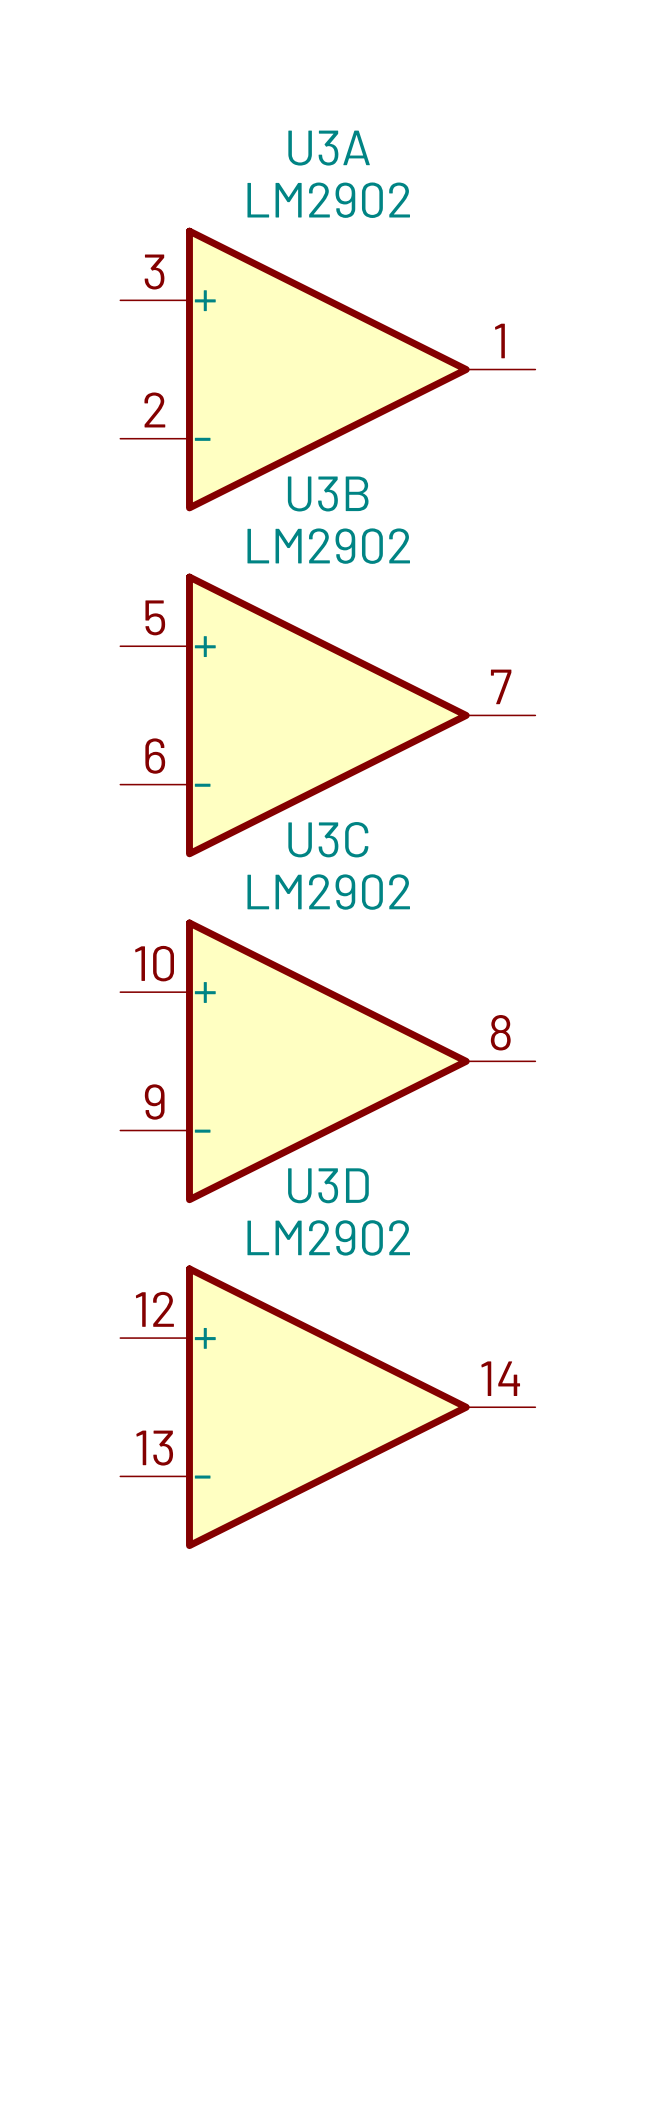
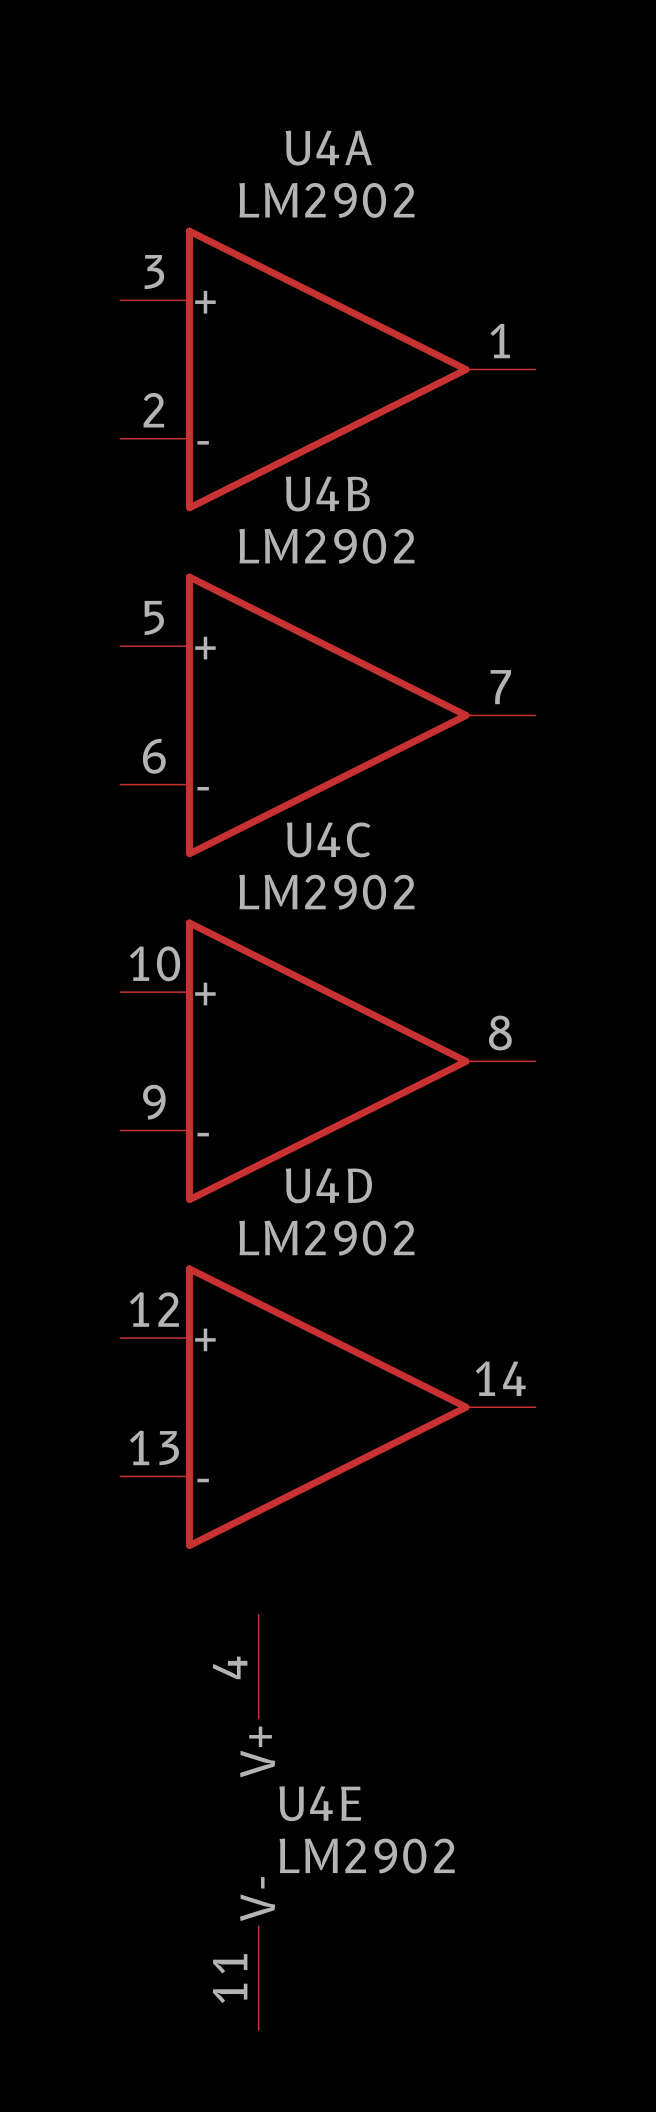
U3A name: U3A (329, 148) -> U4A (328, 148)
U3B name: U3B (328, 493) -> U4B (327, 493)
U3C name: U3C (328, 839) -> U4C (328, 839)
U3D name: U3D (328, 1185) -> U4D (328, 1185)
U4E: none -> LM2902 (258, 1822)

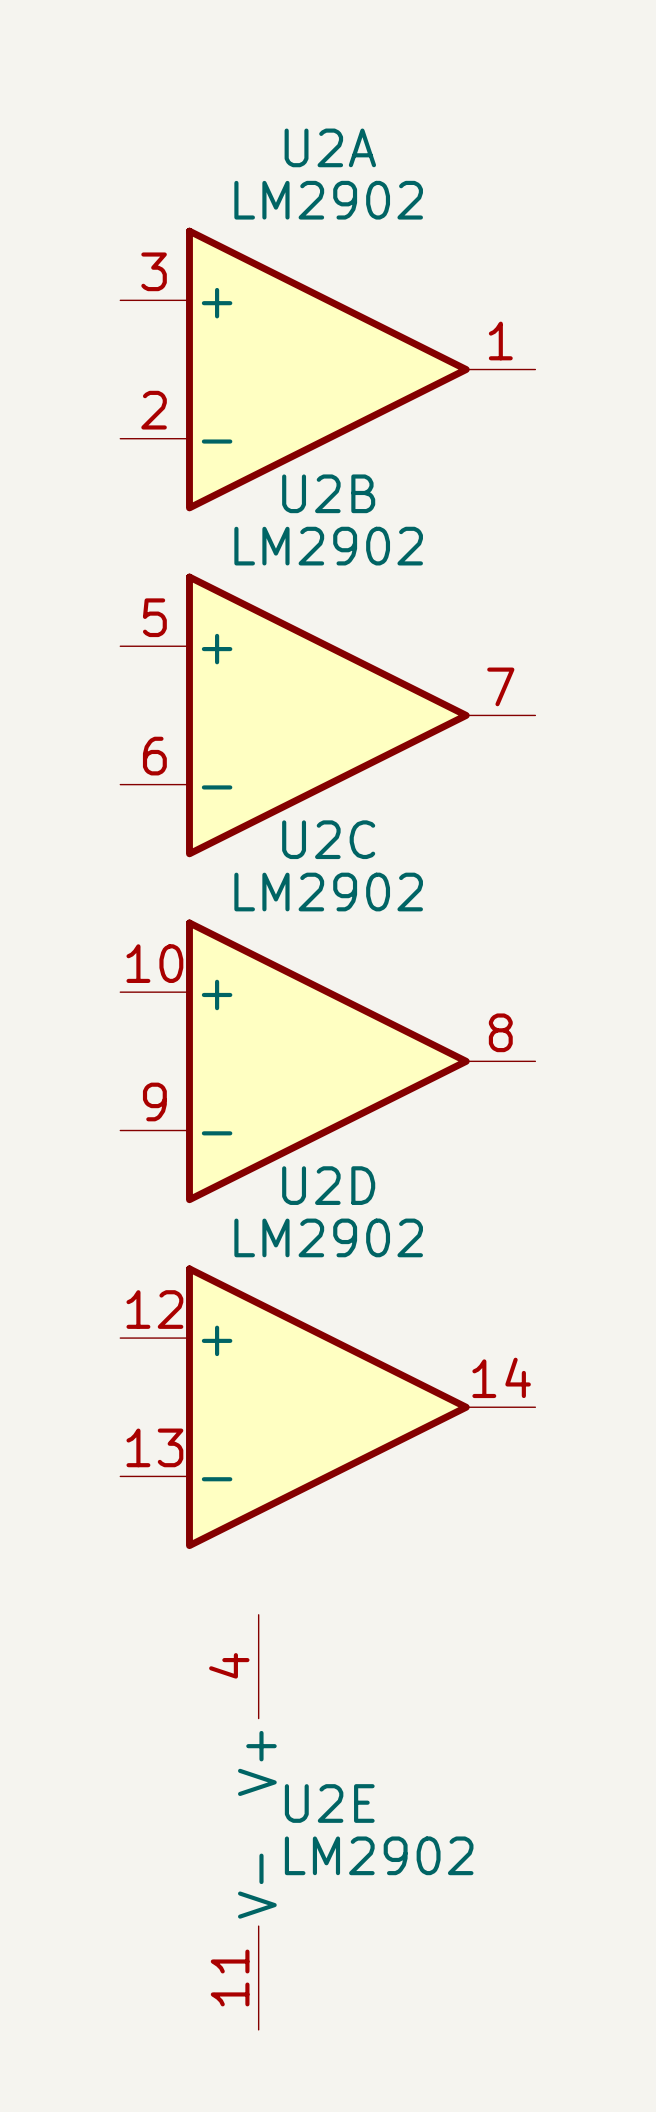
U4A name: U4A (328, 148) -> U2A (330, 147)
U4B name: U4B (327, 493) -> U2B (328, 493)
U4C name: U4C (328, 839) -> U2C (328, 839)
U4D name: U4D (328, 1185) -> U2D (328, 1185)
U4E name: U4E (320, 1803) -> U2E (329, 1803)

